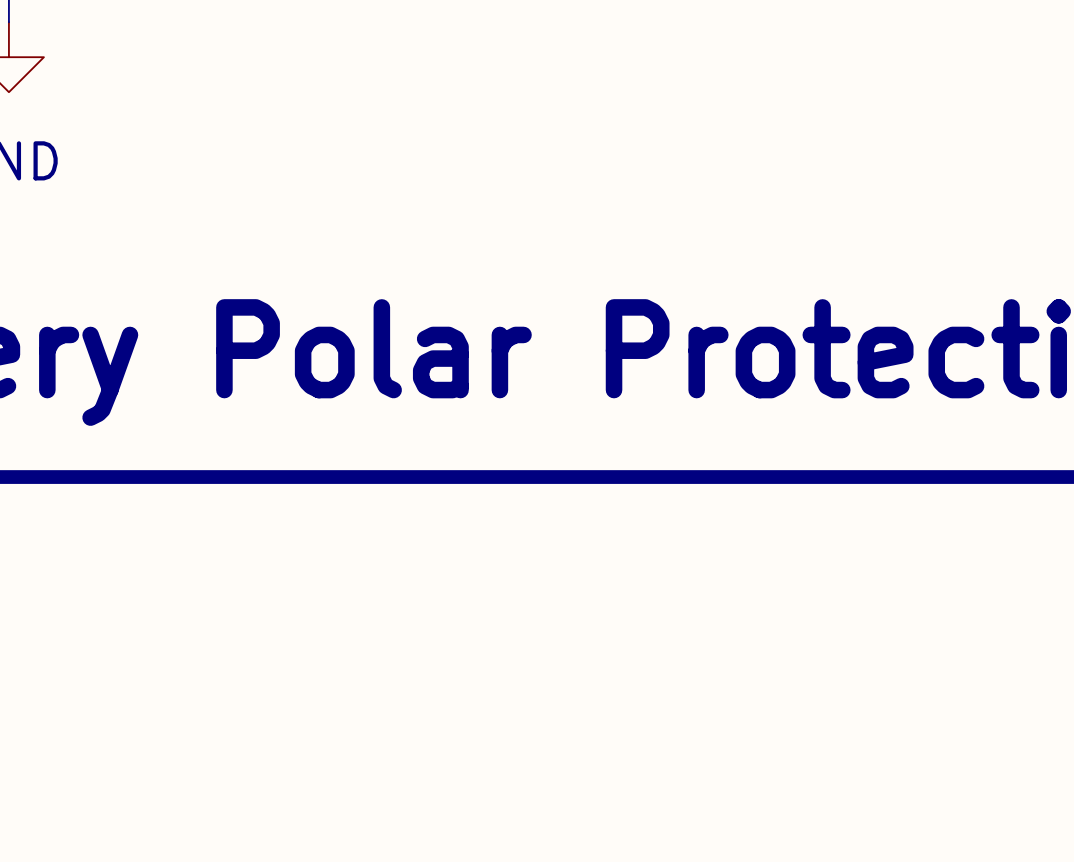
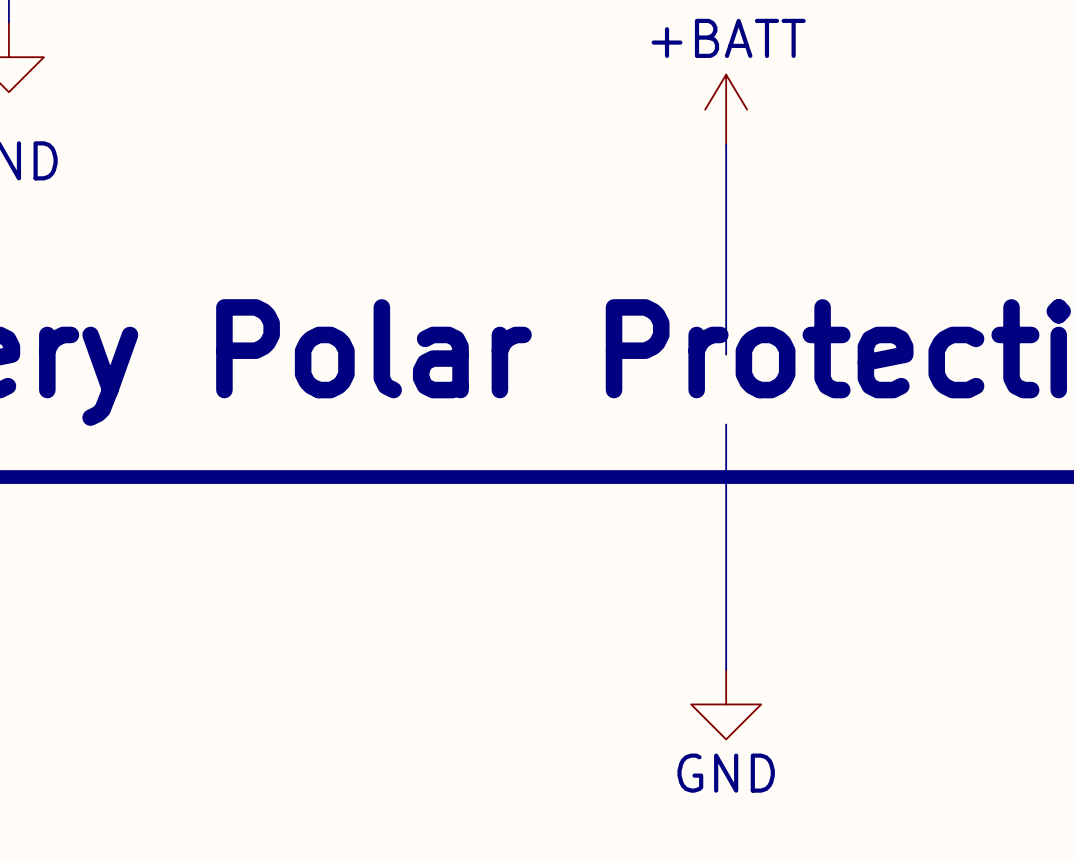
power symbol: none -> +BATT (726, 109)
wire: none -> (726, 144) (726, 354)
wire: none -> (726, 424) (726, 669)
power symbol: none -> GND (726, 704)

